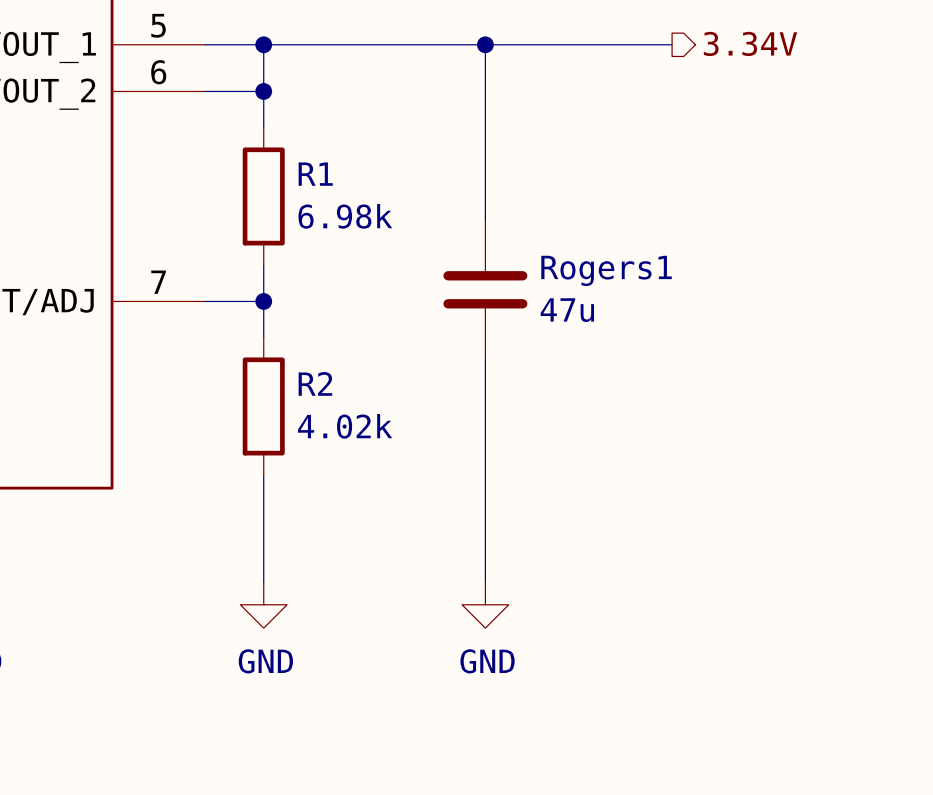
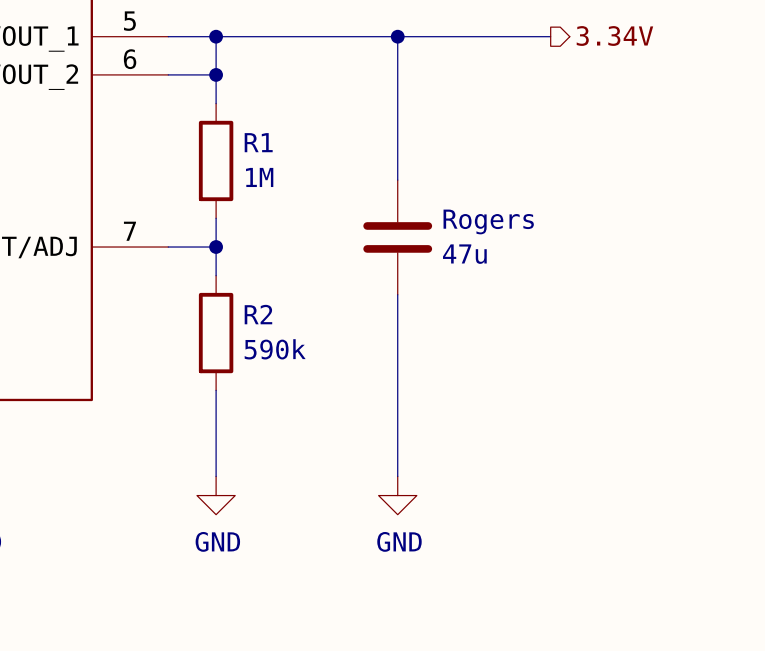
R1 value: 6.98k (345, 216) -> 1M (259, 177)
Rogers1 name: Rogers1 (606, 270) -> Rogers (488, 221)
R2 value: 4.02k (345, 426) -> 590k (275, 349)

